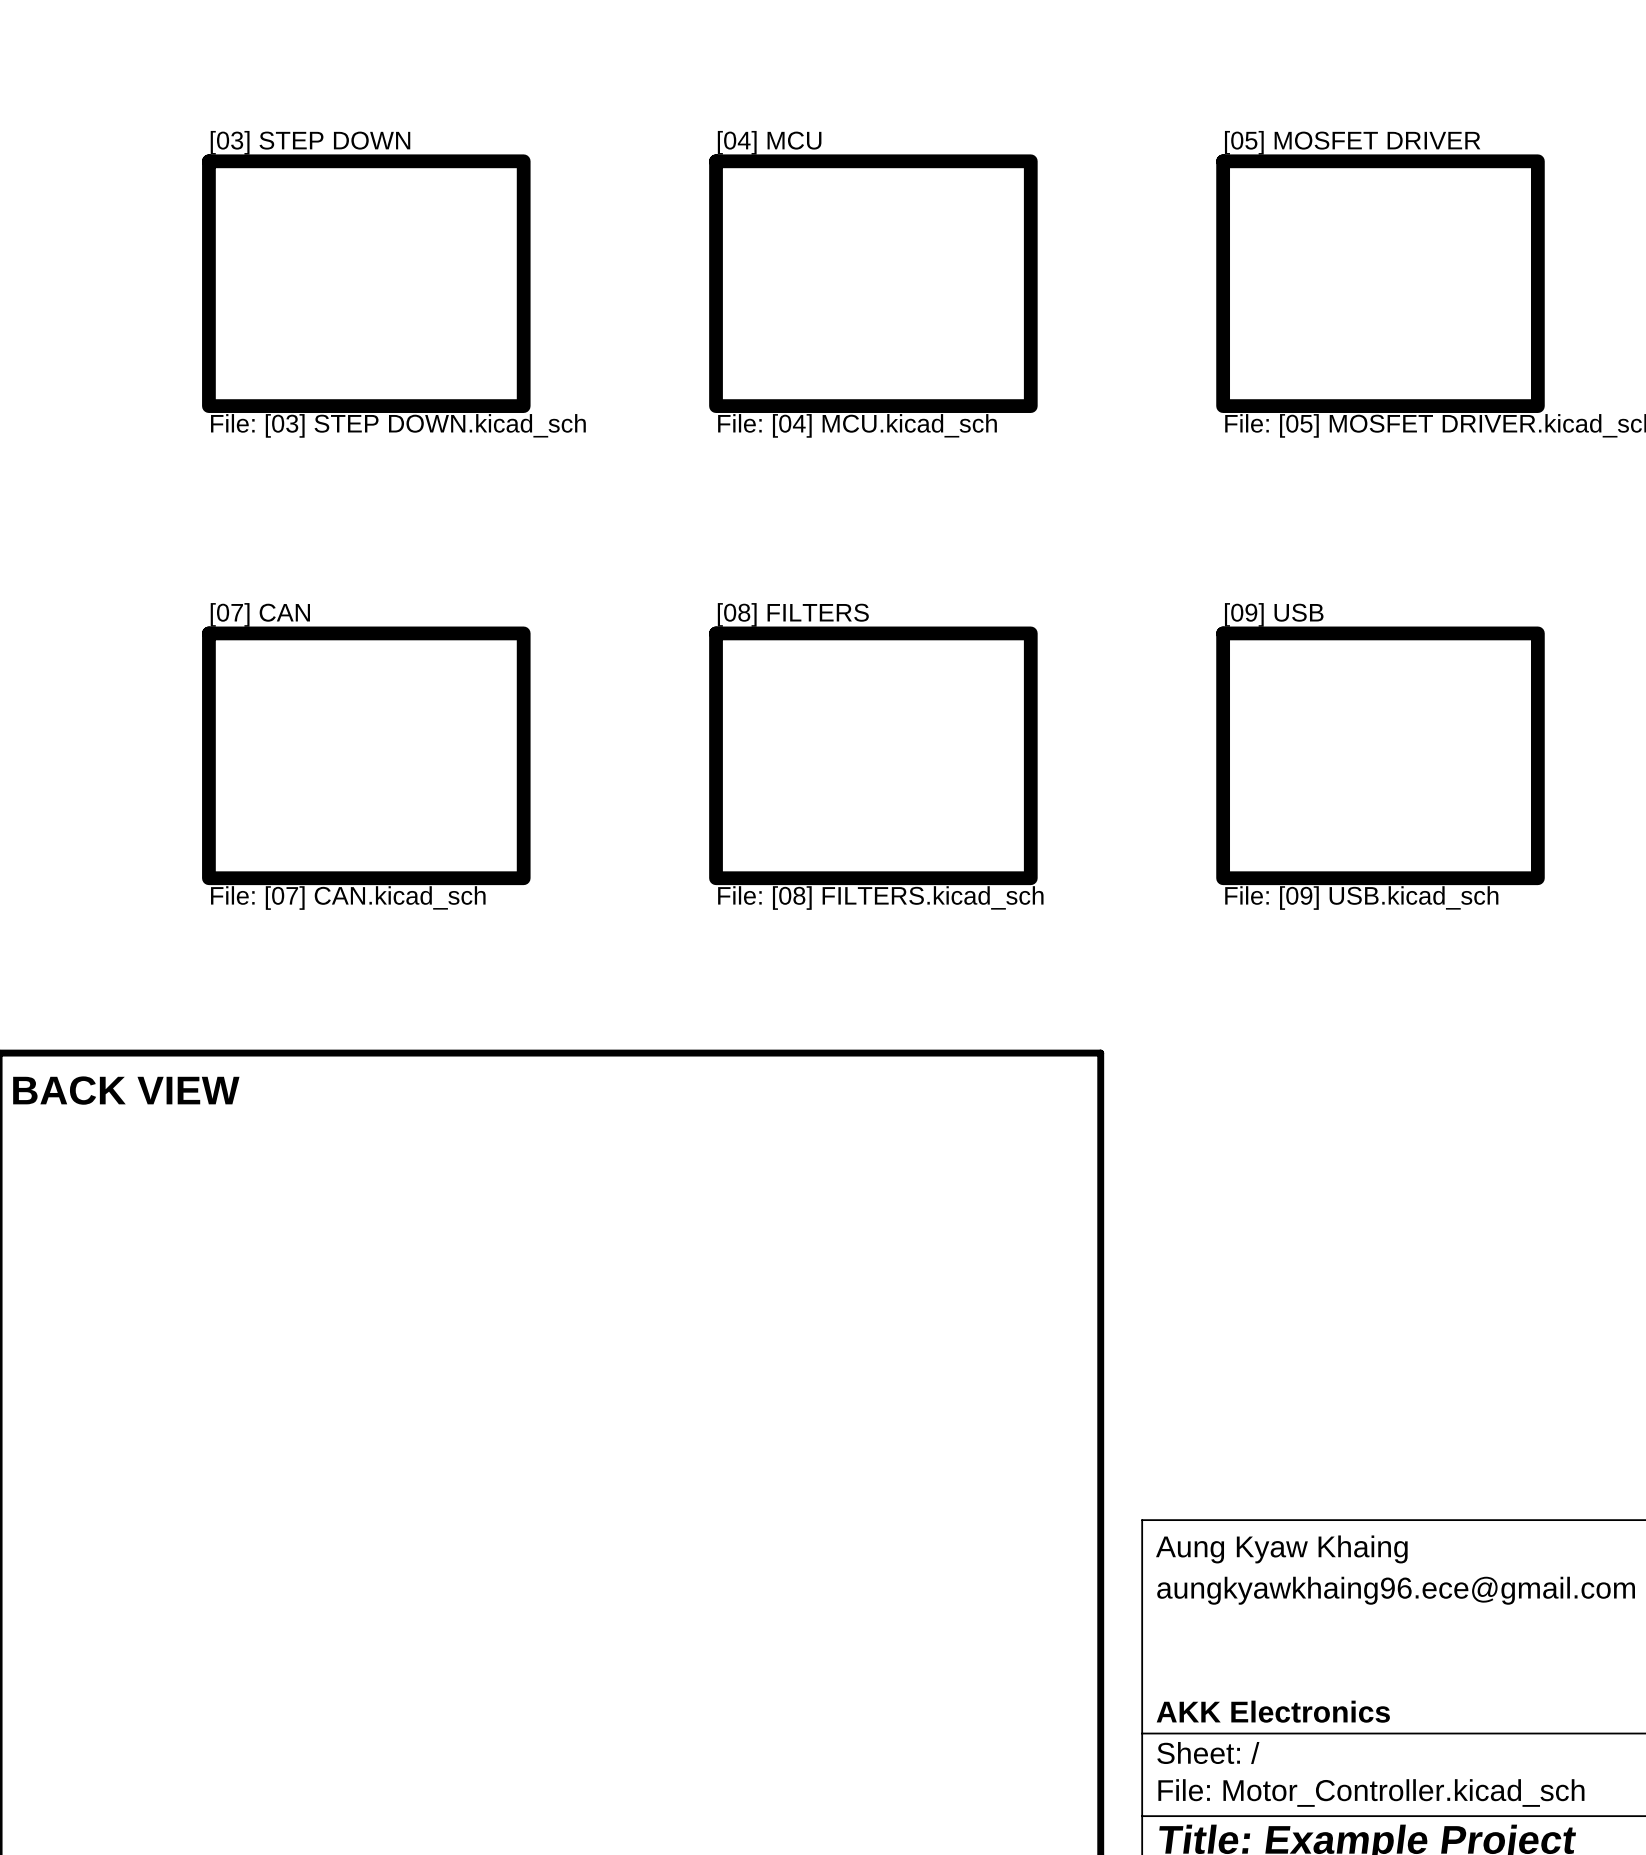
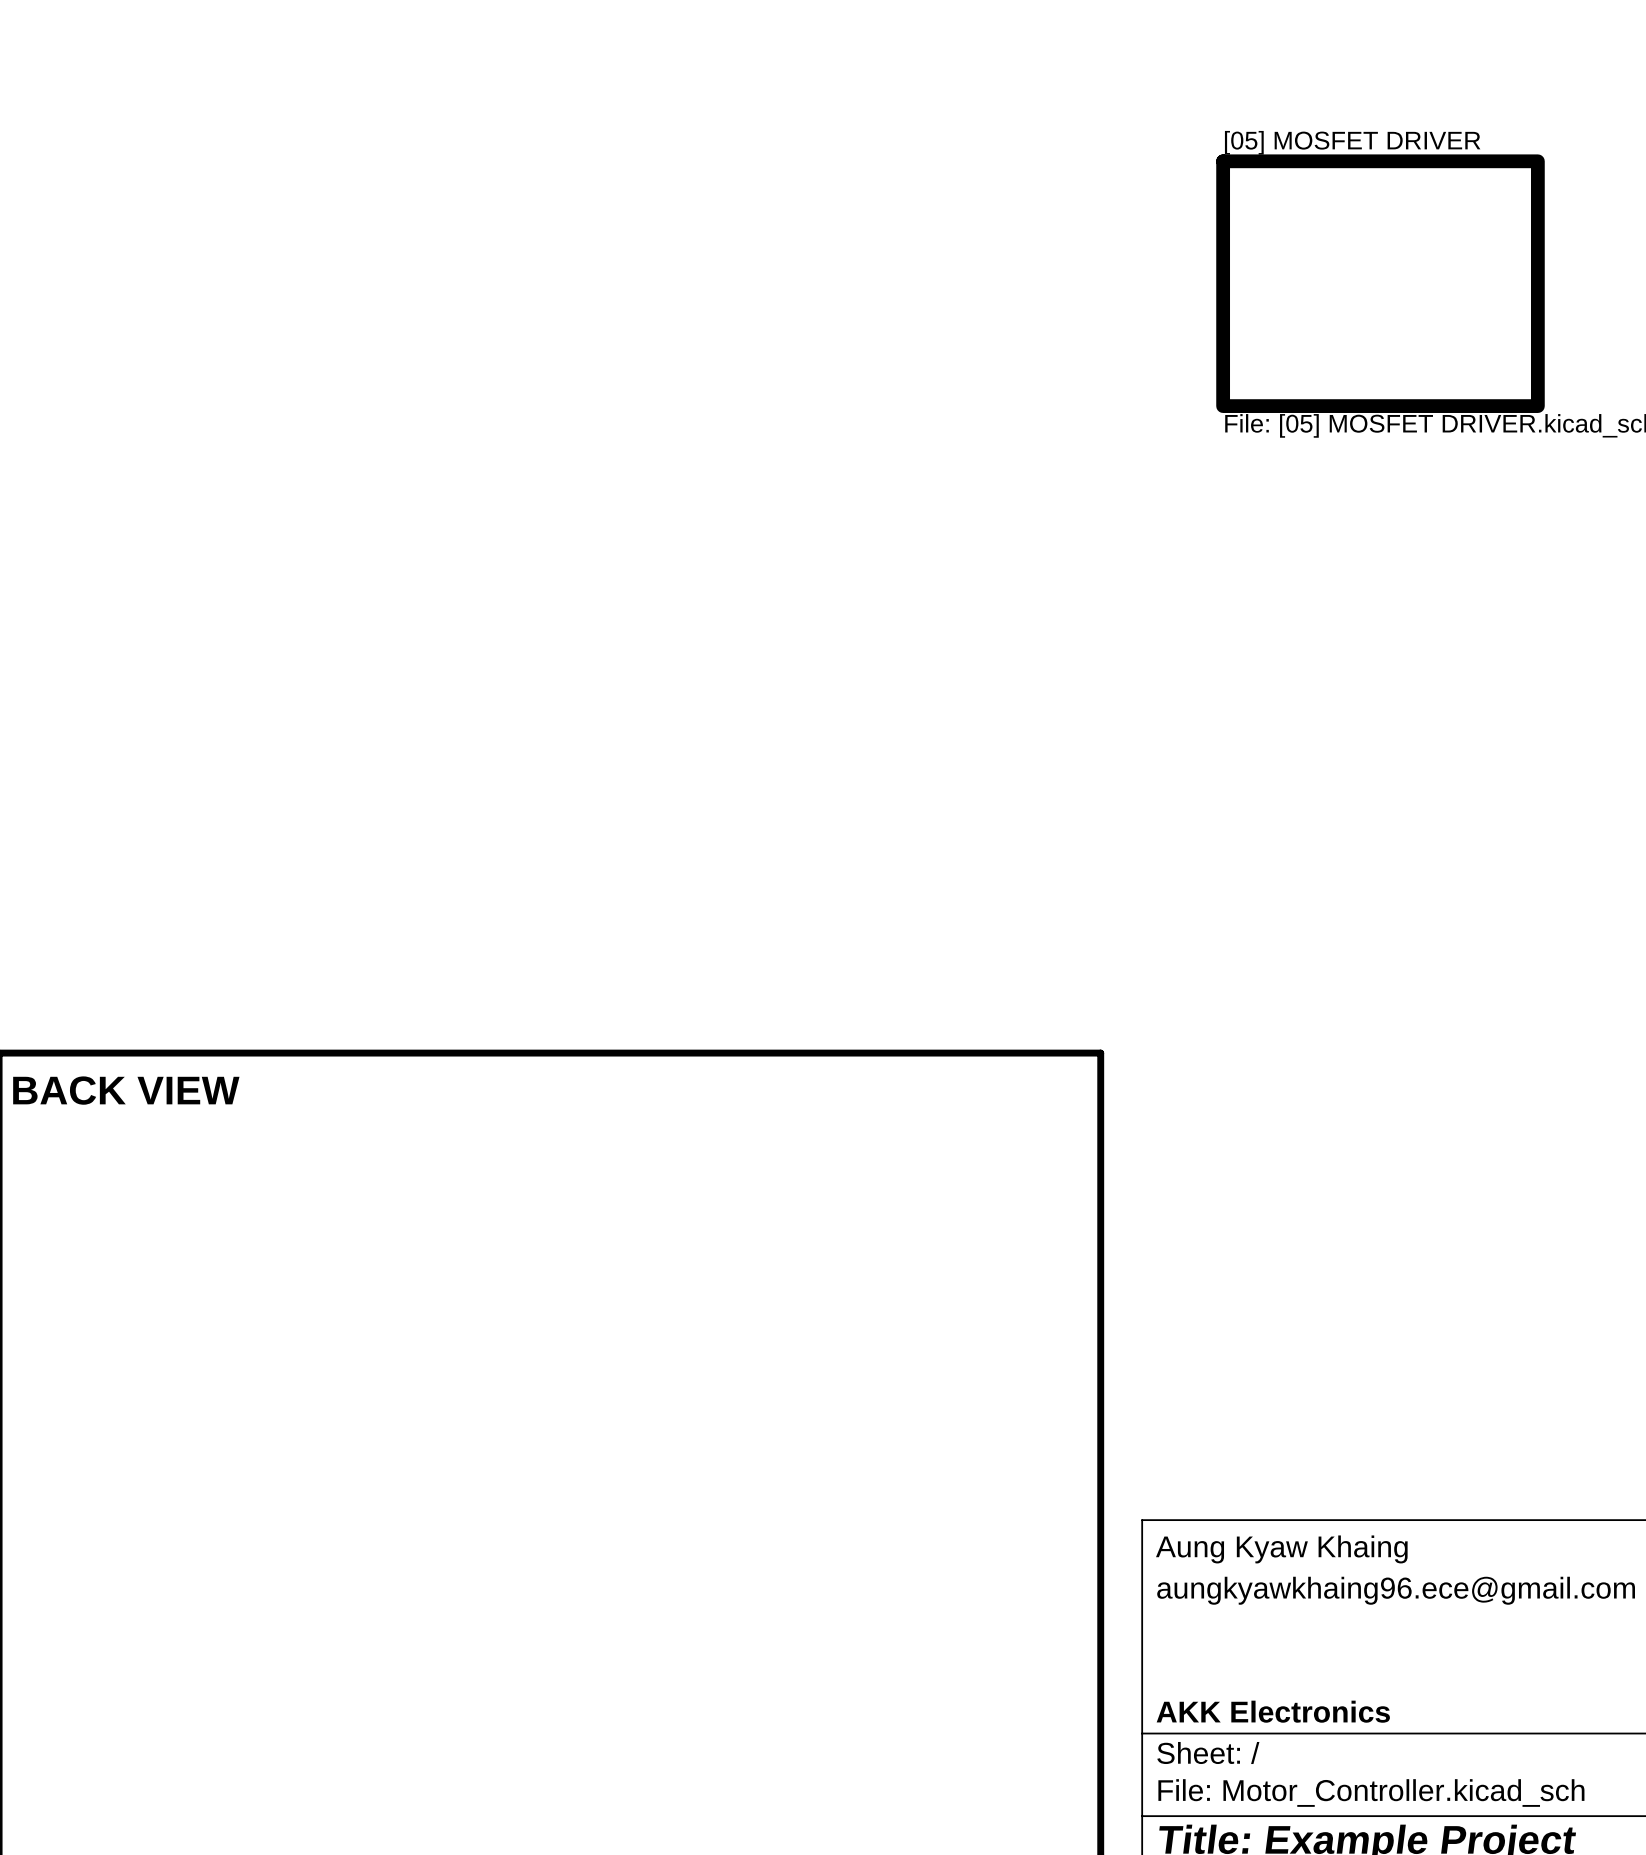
sheet [03] STEP DOWN: File: [03] STEP DOWN.kicad_sch (366, 283) -> none
sheet [04] MCU: File: [04] MCU.kicad_sch (873, 283) -> none
sheet [07] CAN: File: [07] CAN.kicad_sch (366, 755) -> none
sheet [08] FILTERS: File: [08] FILTERS.kicad_sch (873, 755) -> none
sheet [09] USB: File: [09] USB.kicad_sch (1380, 755) -> none

